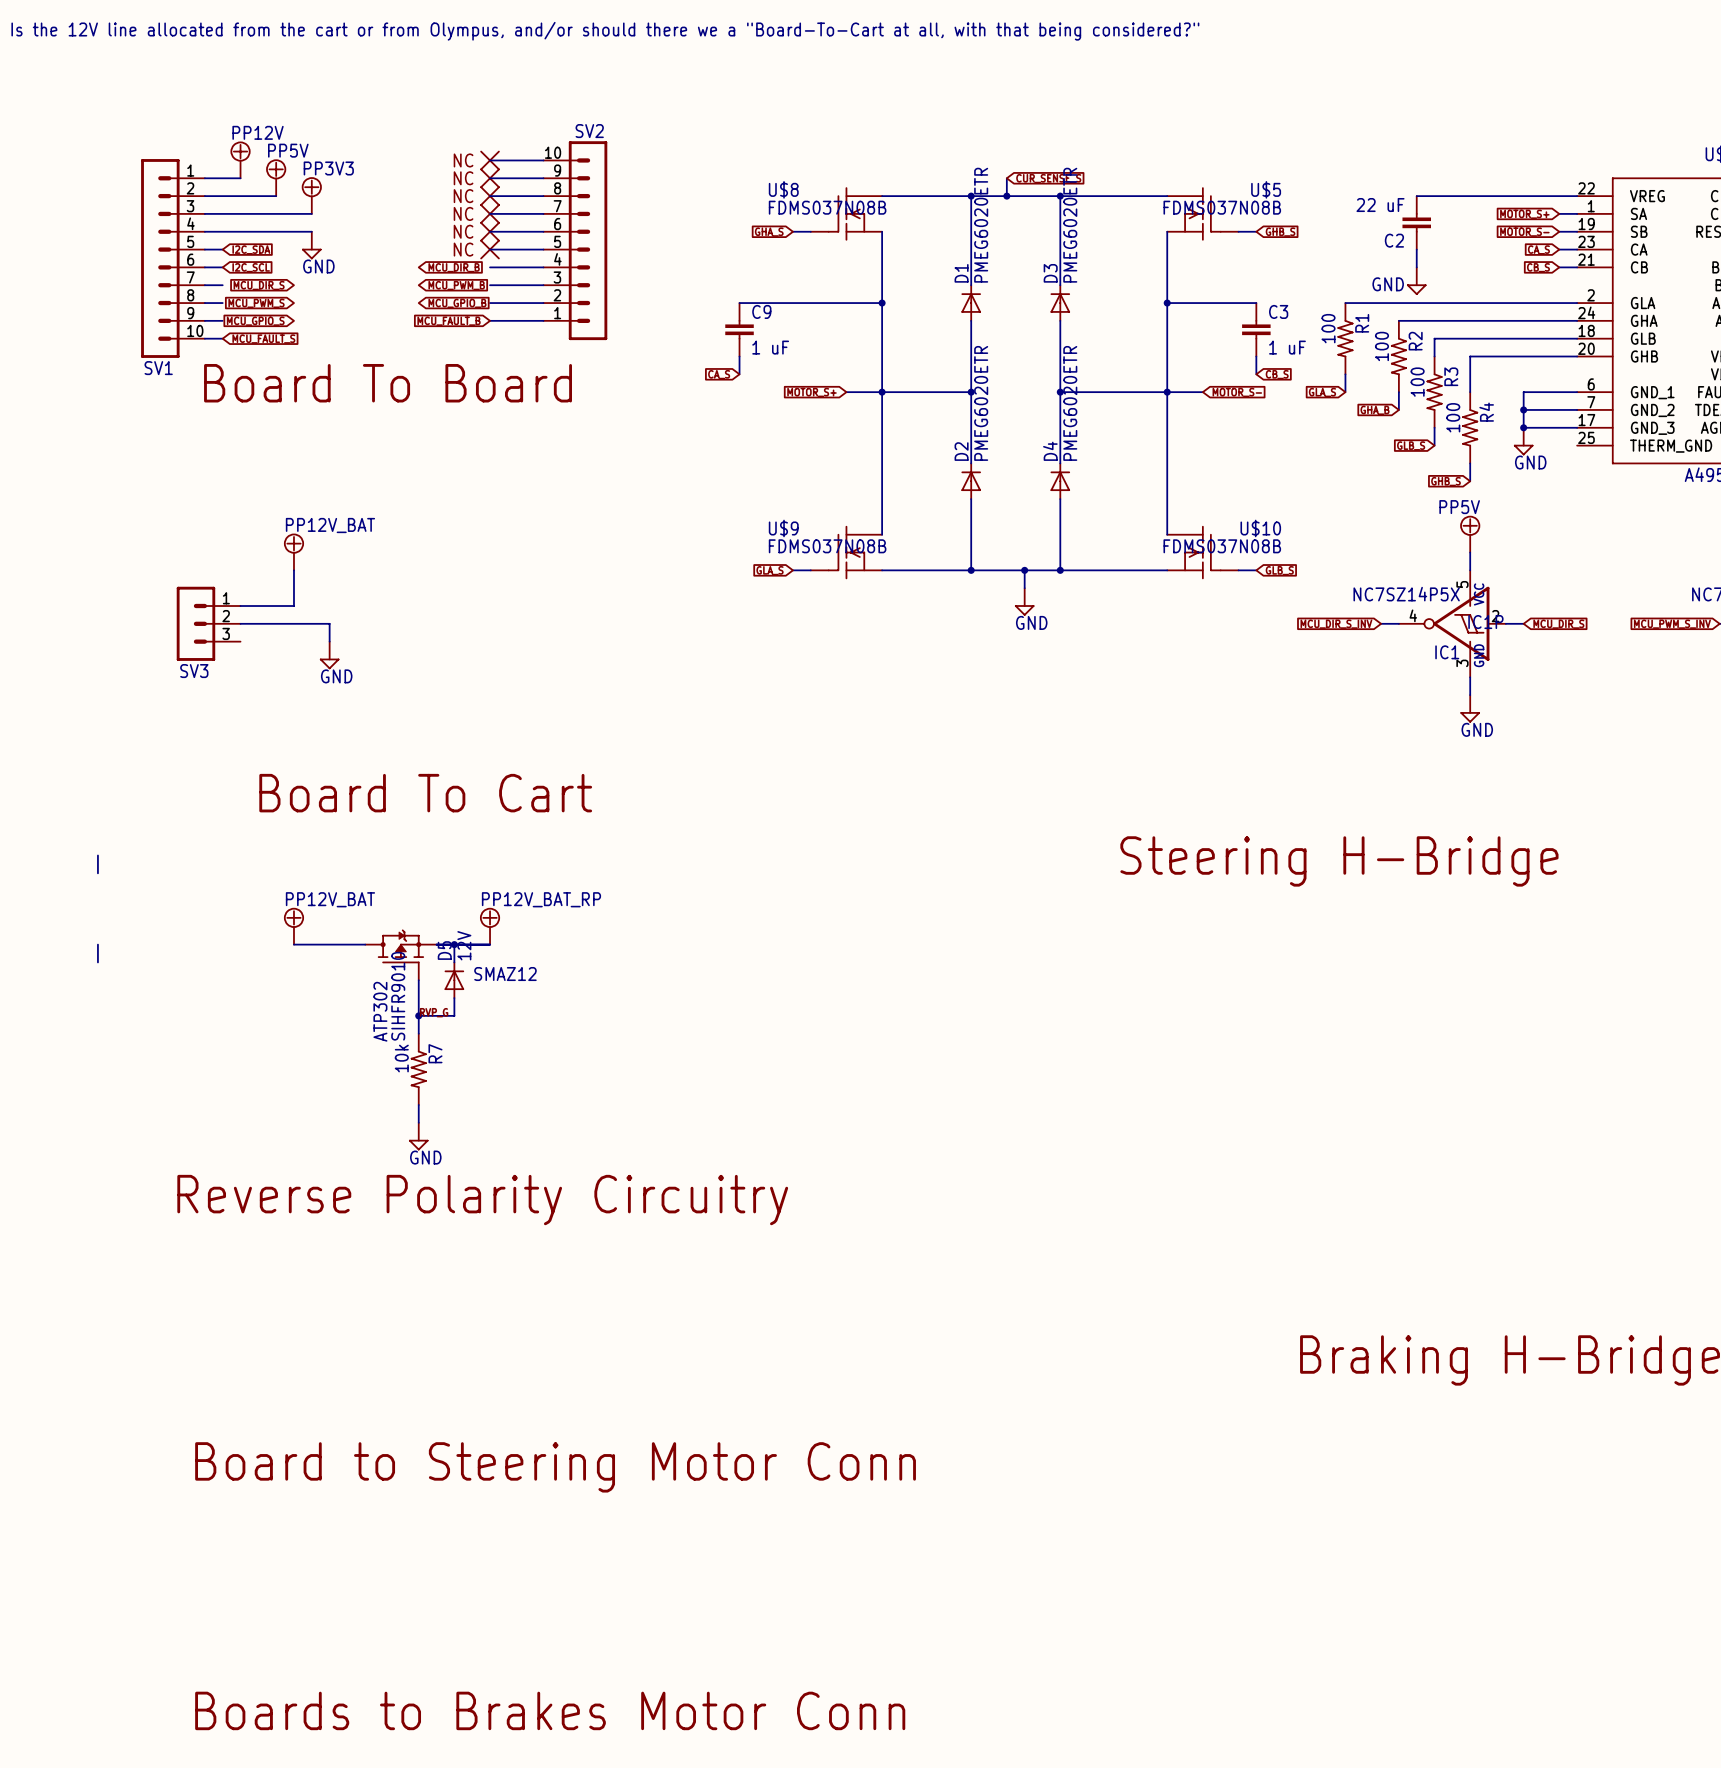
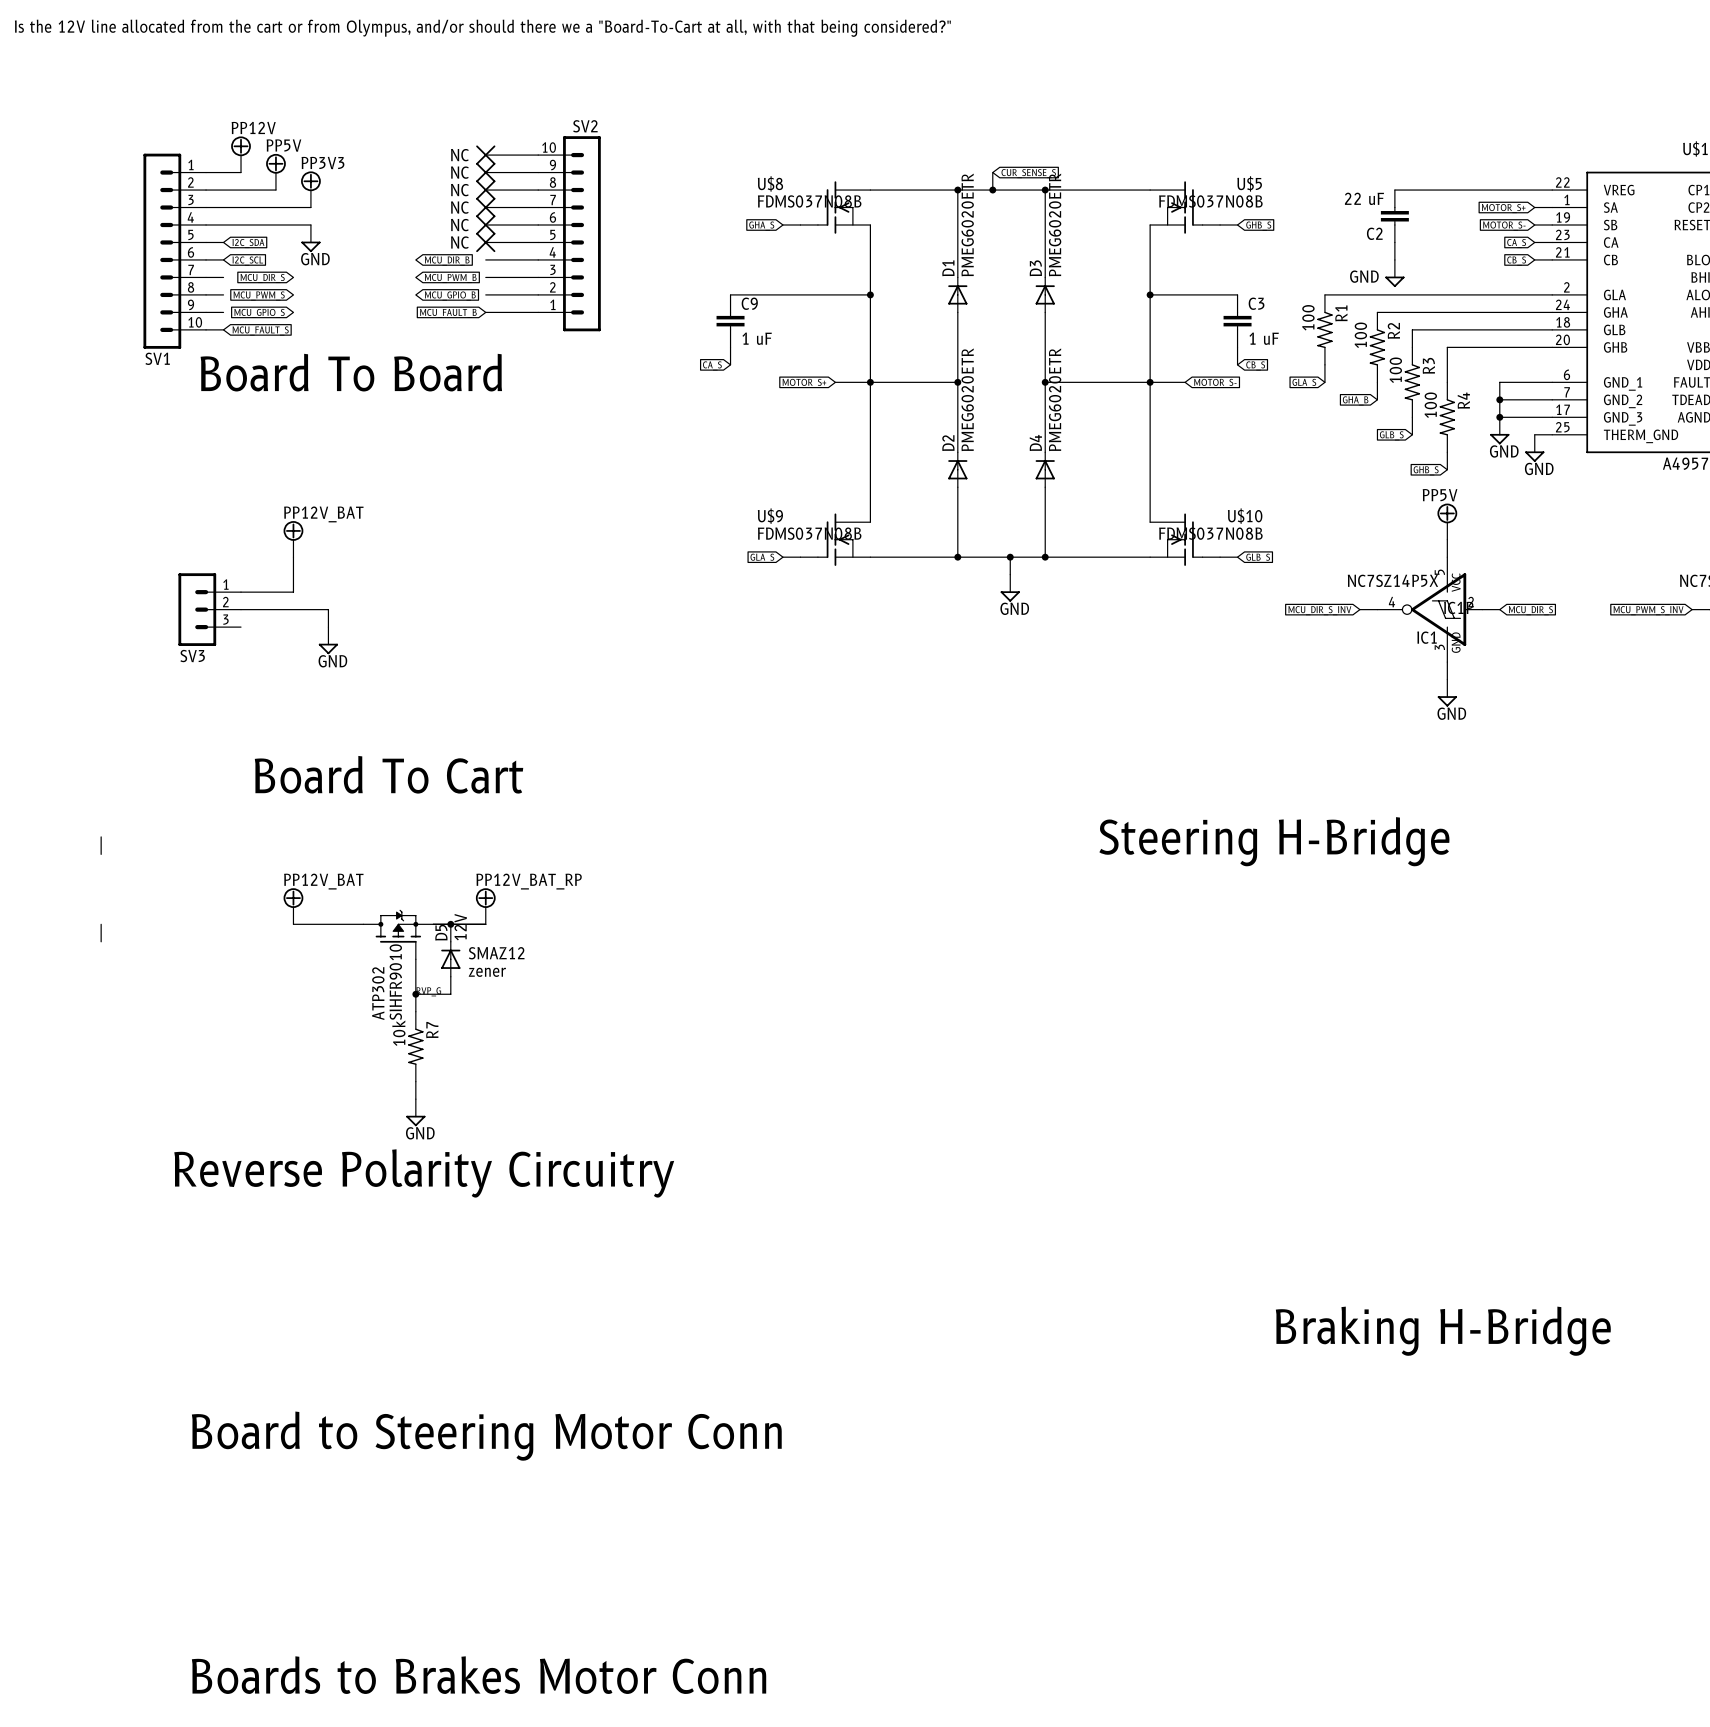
wire: none -> (1534, 434) (1552, 434)
power symbol: none -> GND (1534, 448)
text: none -> zener (487, 972)

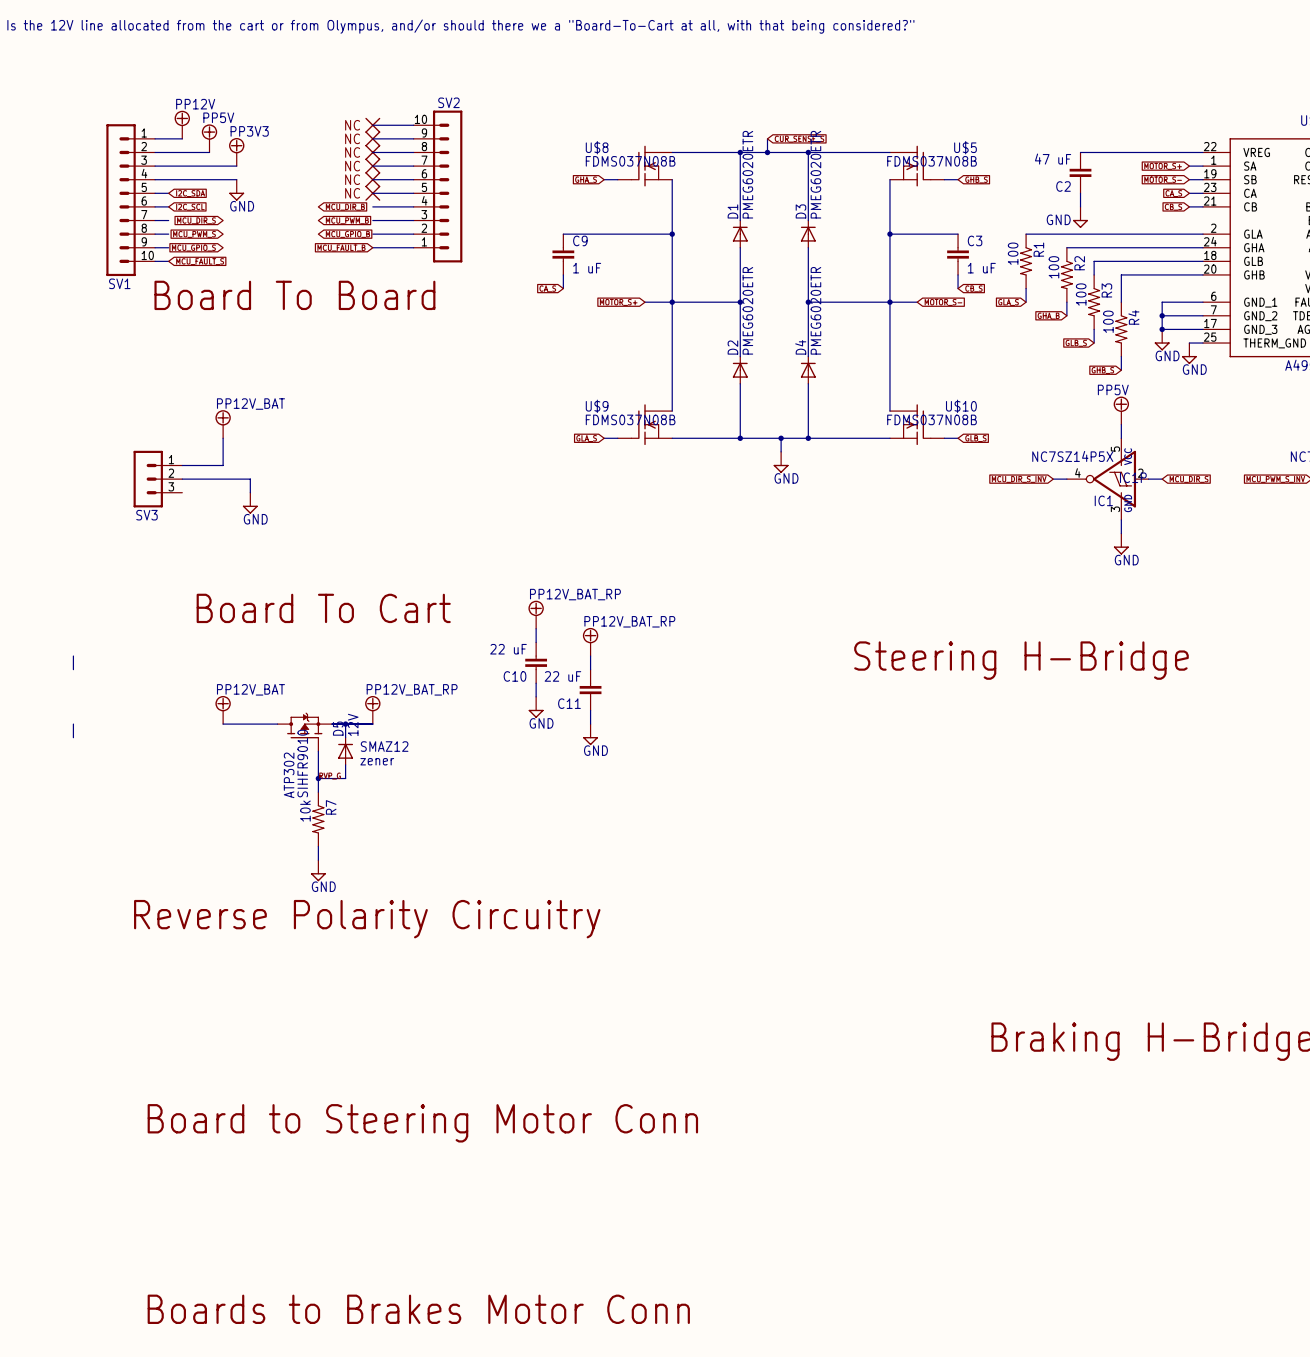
C2 value: 22 uF (1364, 198) -> 47 uF (1053, 159)
power symbol: none -> PP12V_BAT_RP (536, 614)
wire: none -> (536, 628) (536, 642)
power symbol: none -> PP12V_BAT_RP (590, 641)
wire: none -> (590, 656) (590, 669)
C10: none -> 22 uF (536, 662)
wire: none -> (536, 683) (536, 696)
C11: none -> 22 uF (590, 690)
power symbol: none -> GND (536, 707)
wire: none -> (590, 710) (590, 724)
power symbol: none -> GND (590, 734)

